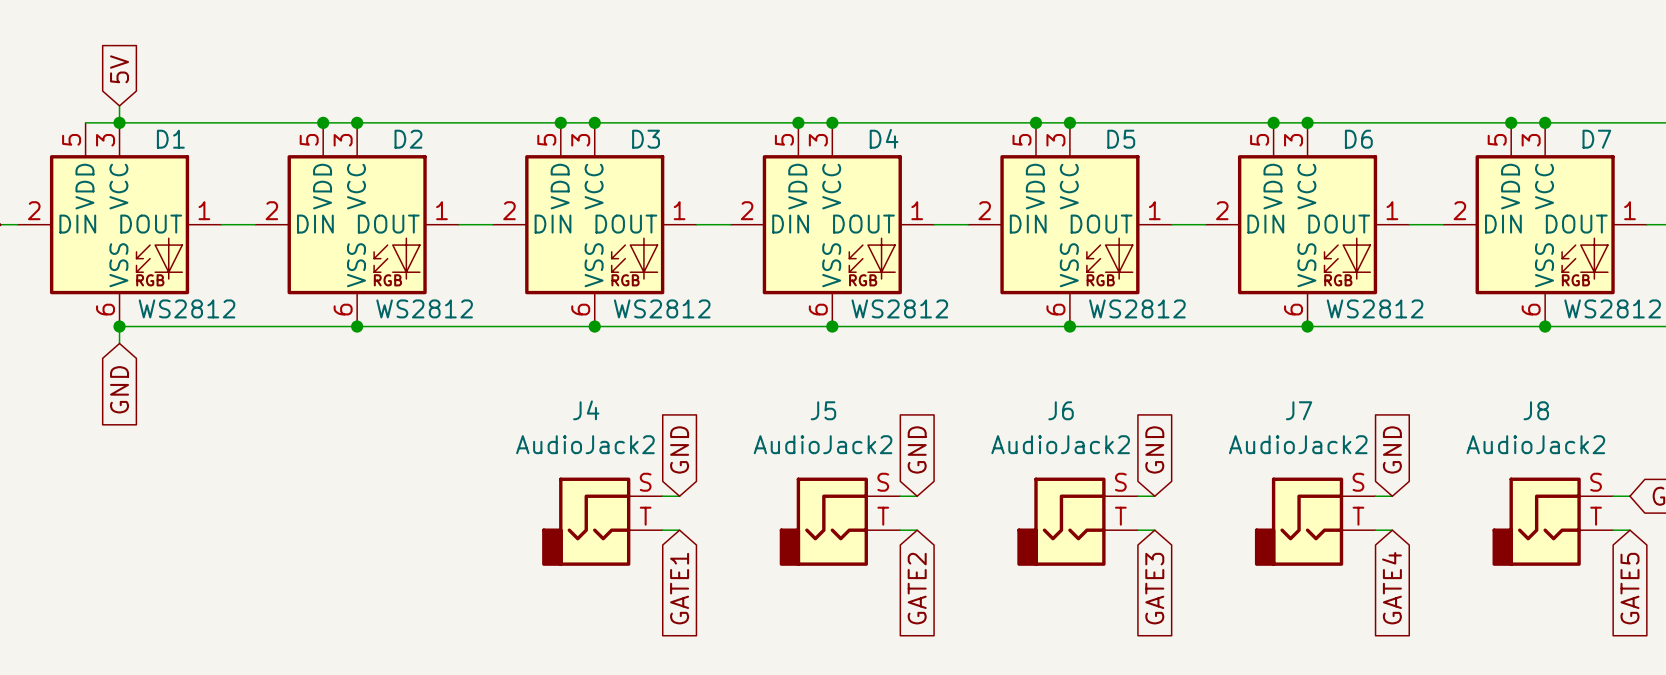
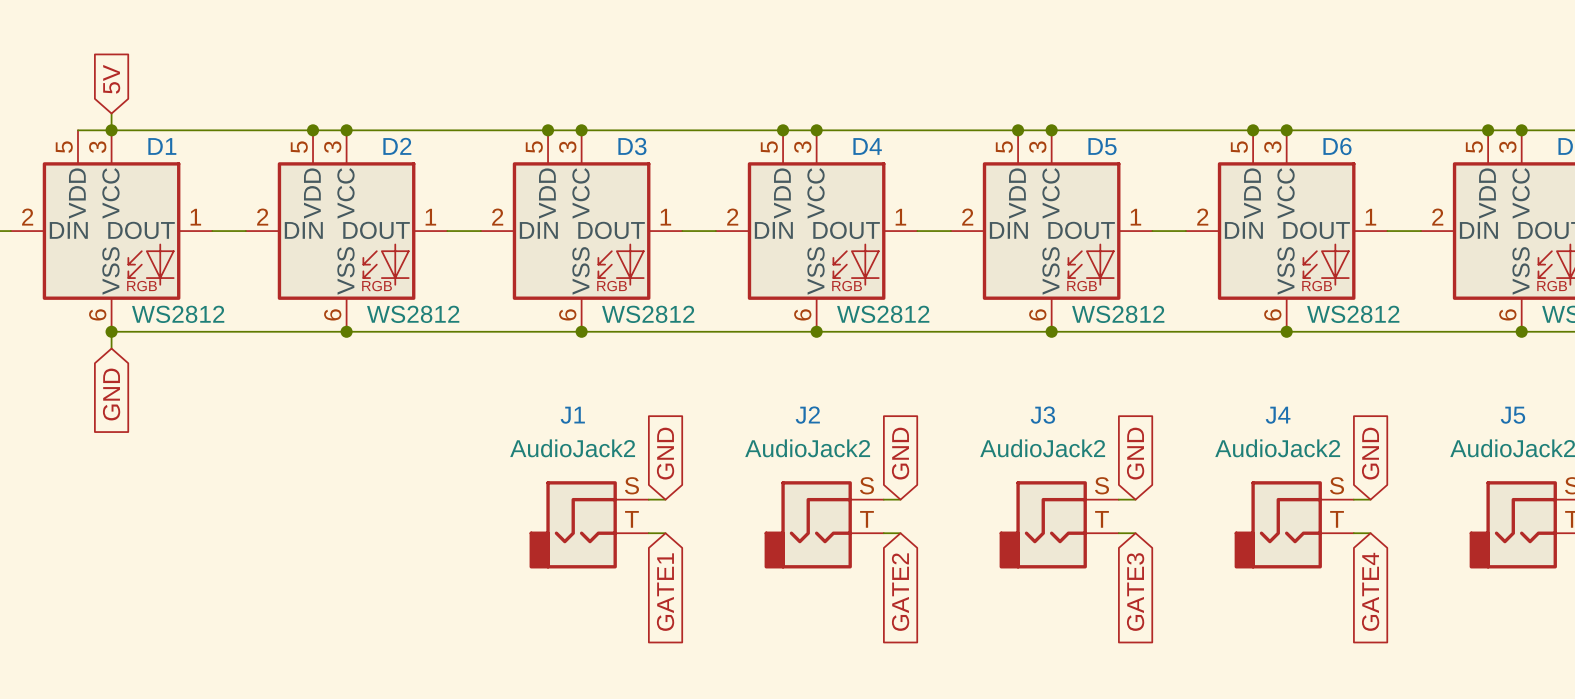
J4 name: J4 (586, 410) -> J1 (572, 415)
J5 name: J5 (823, 410) -> J2 (807, 415)
J6 name: J6 (1061, 410) -> J3 (1042, 415)
J7 name: J7 (1299, 410) -> J4 (1278, 415)
J8 name: J8 (1536, 410) -> J5 (1512, 415)

